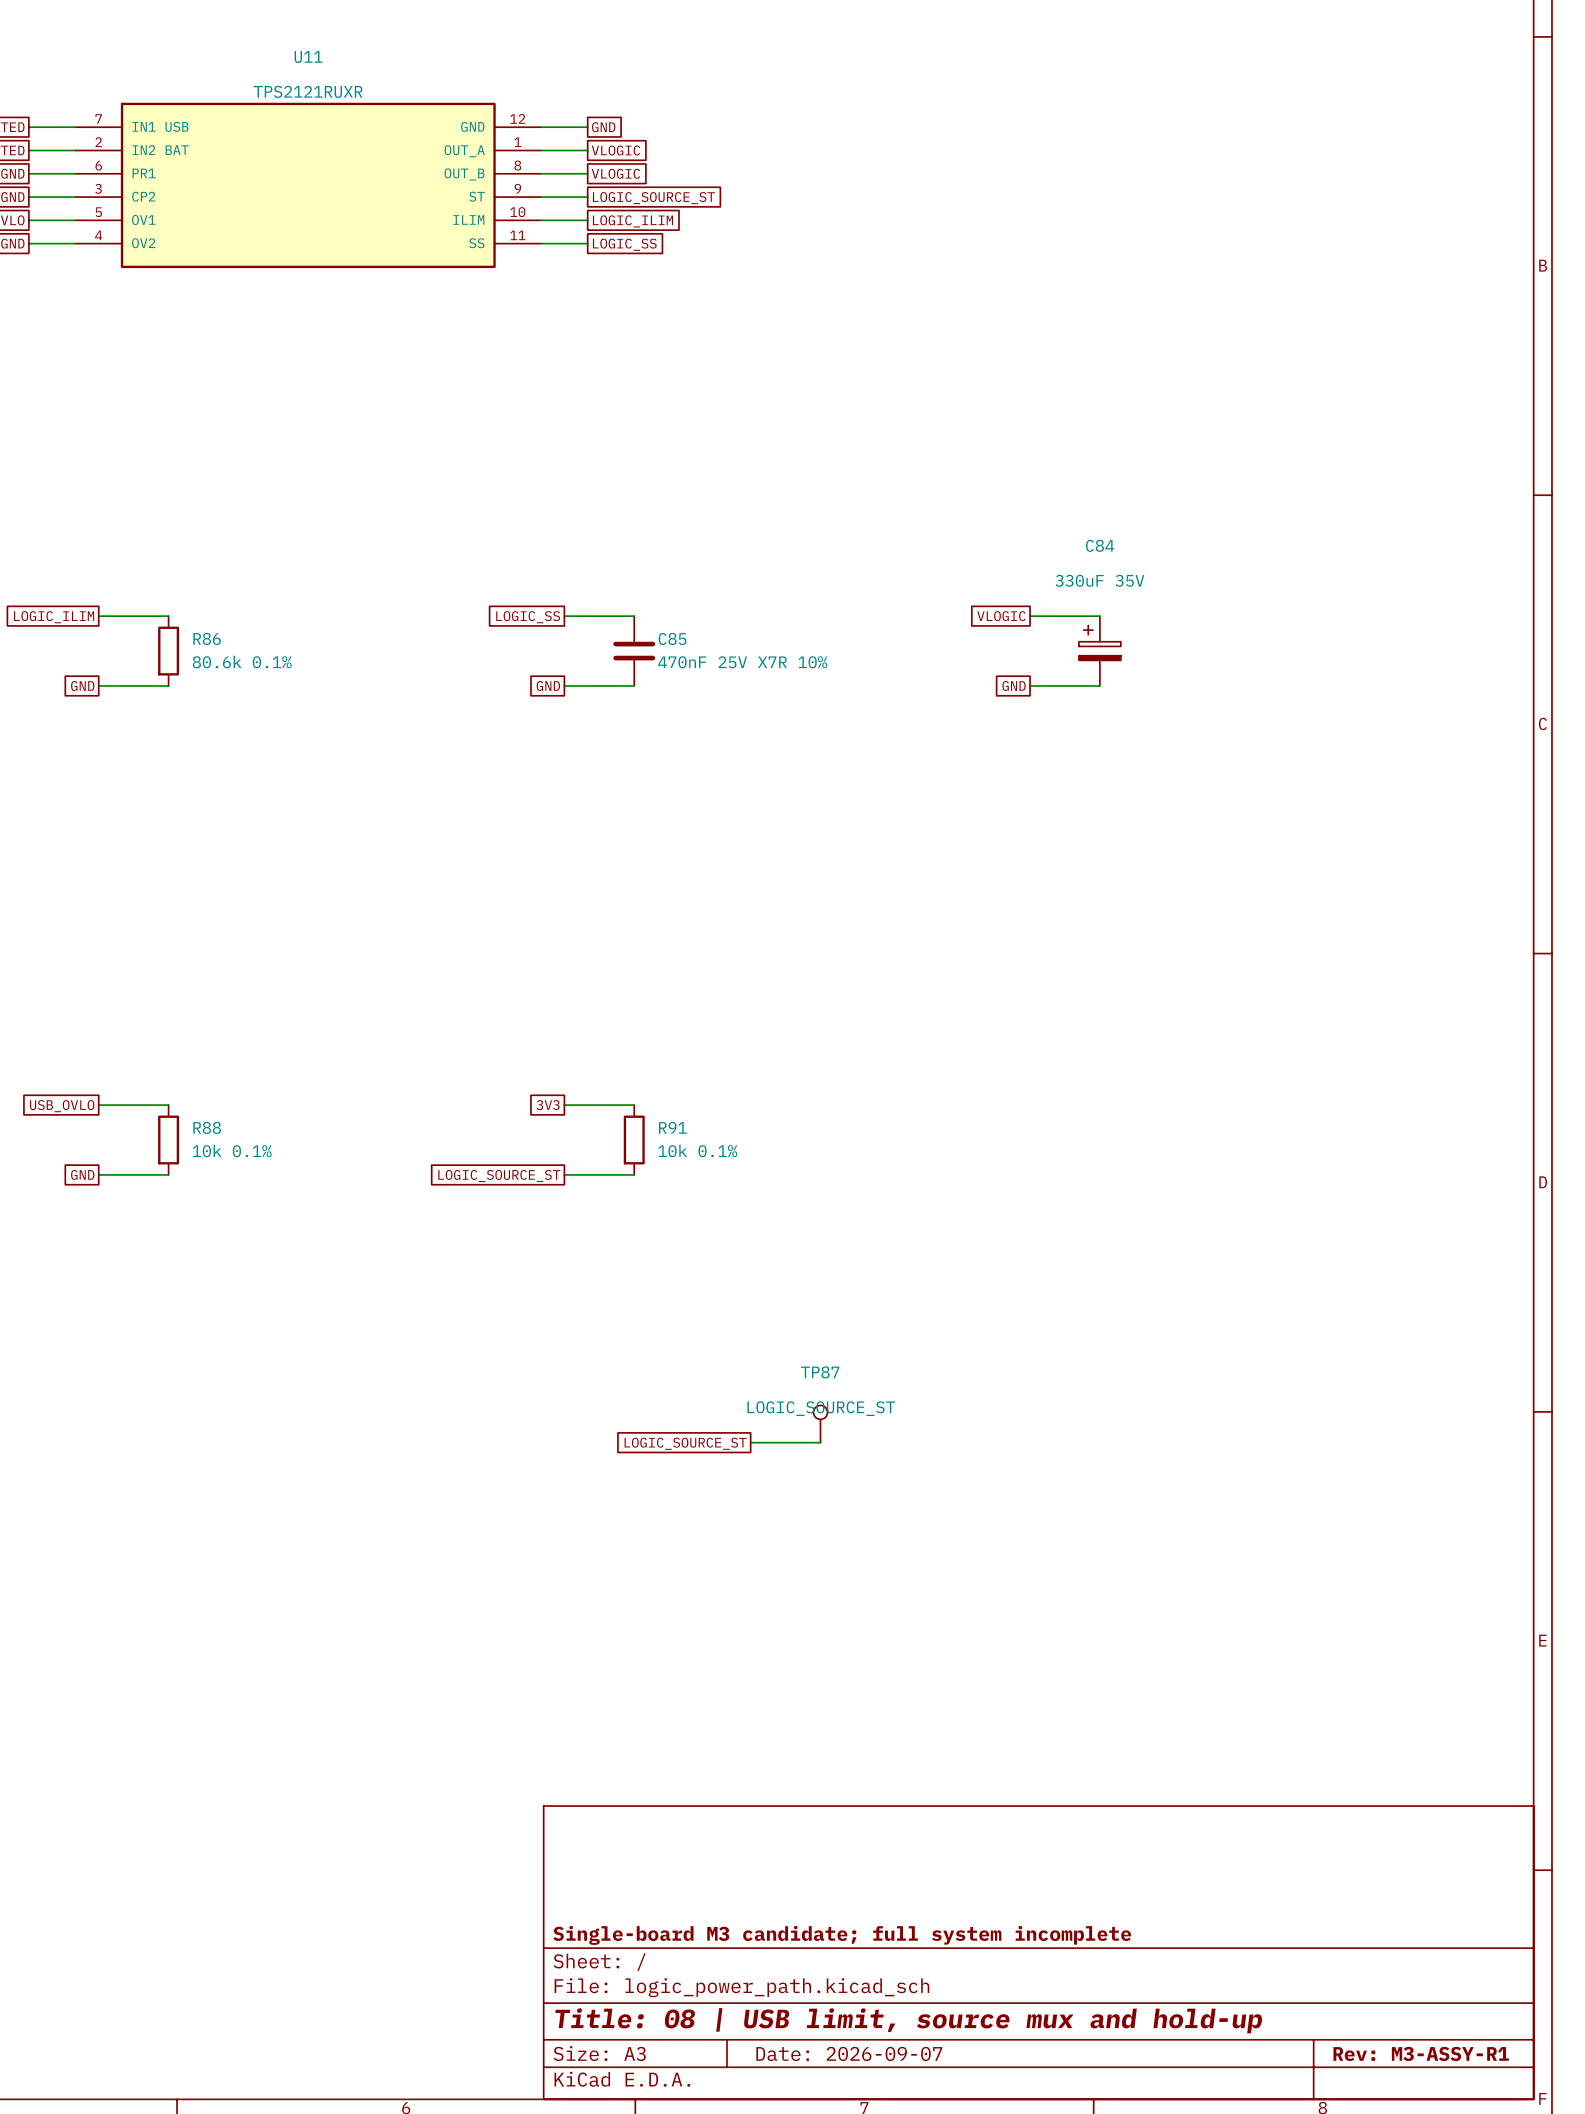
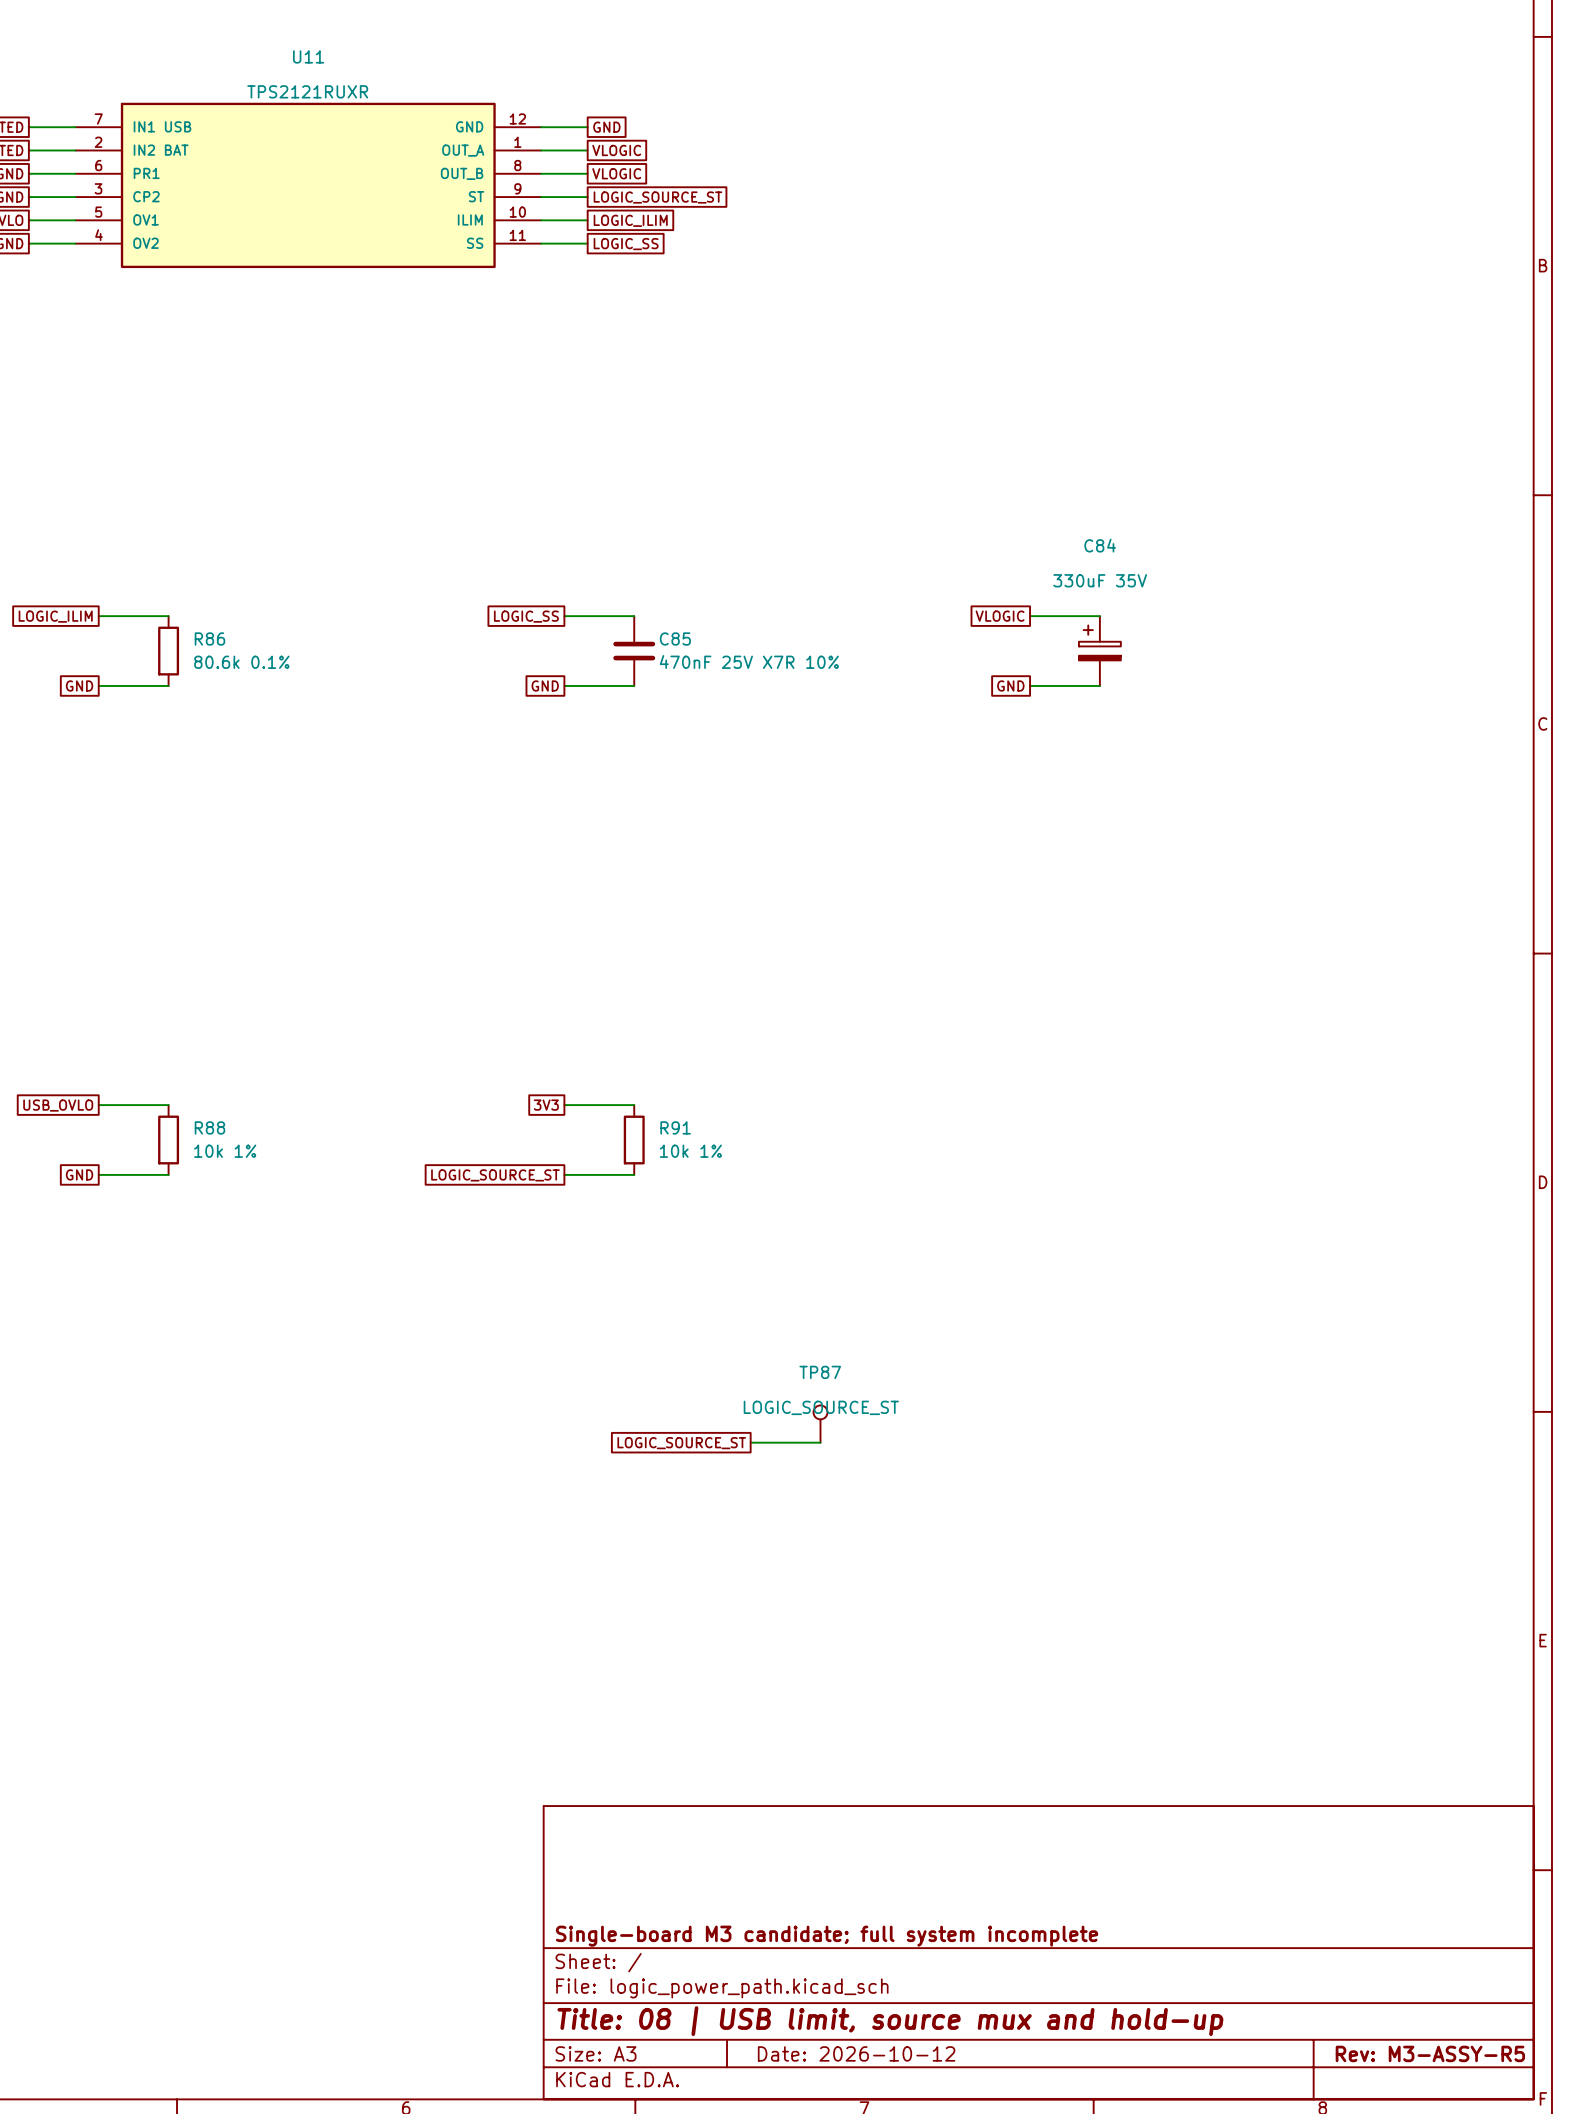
R88 value: 10k 0.1% (232, 1150) -> 10k 1% (225, 1151)
R91 value: 10k 0.1% (697, 1150) -> 10k 1% (690, 1151)
title block: Date: 2026-09-07 (849, 2053) -> Date: 2026-10-12 (856, 2053)
title block: Rev: M3-ASSY-R1 (1421, 2053) -> Rev: M3-ASSY-R5 (1430, 2053)

